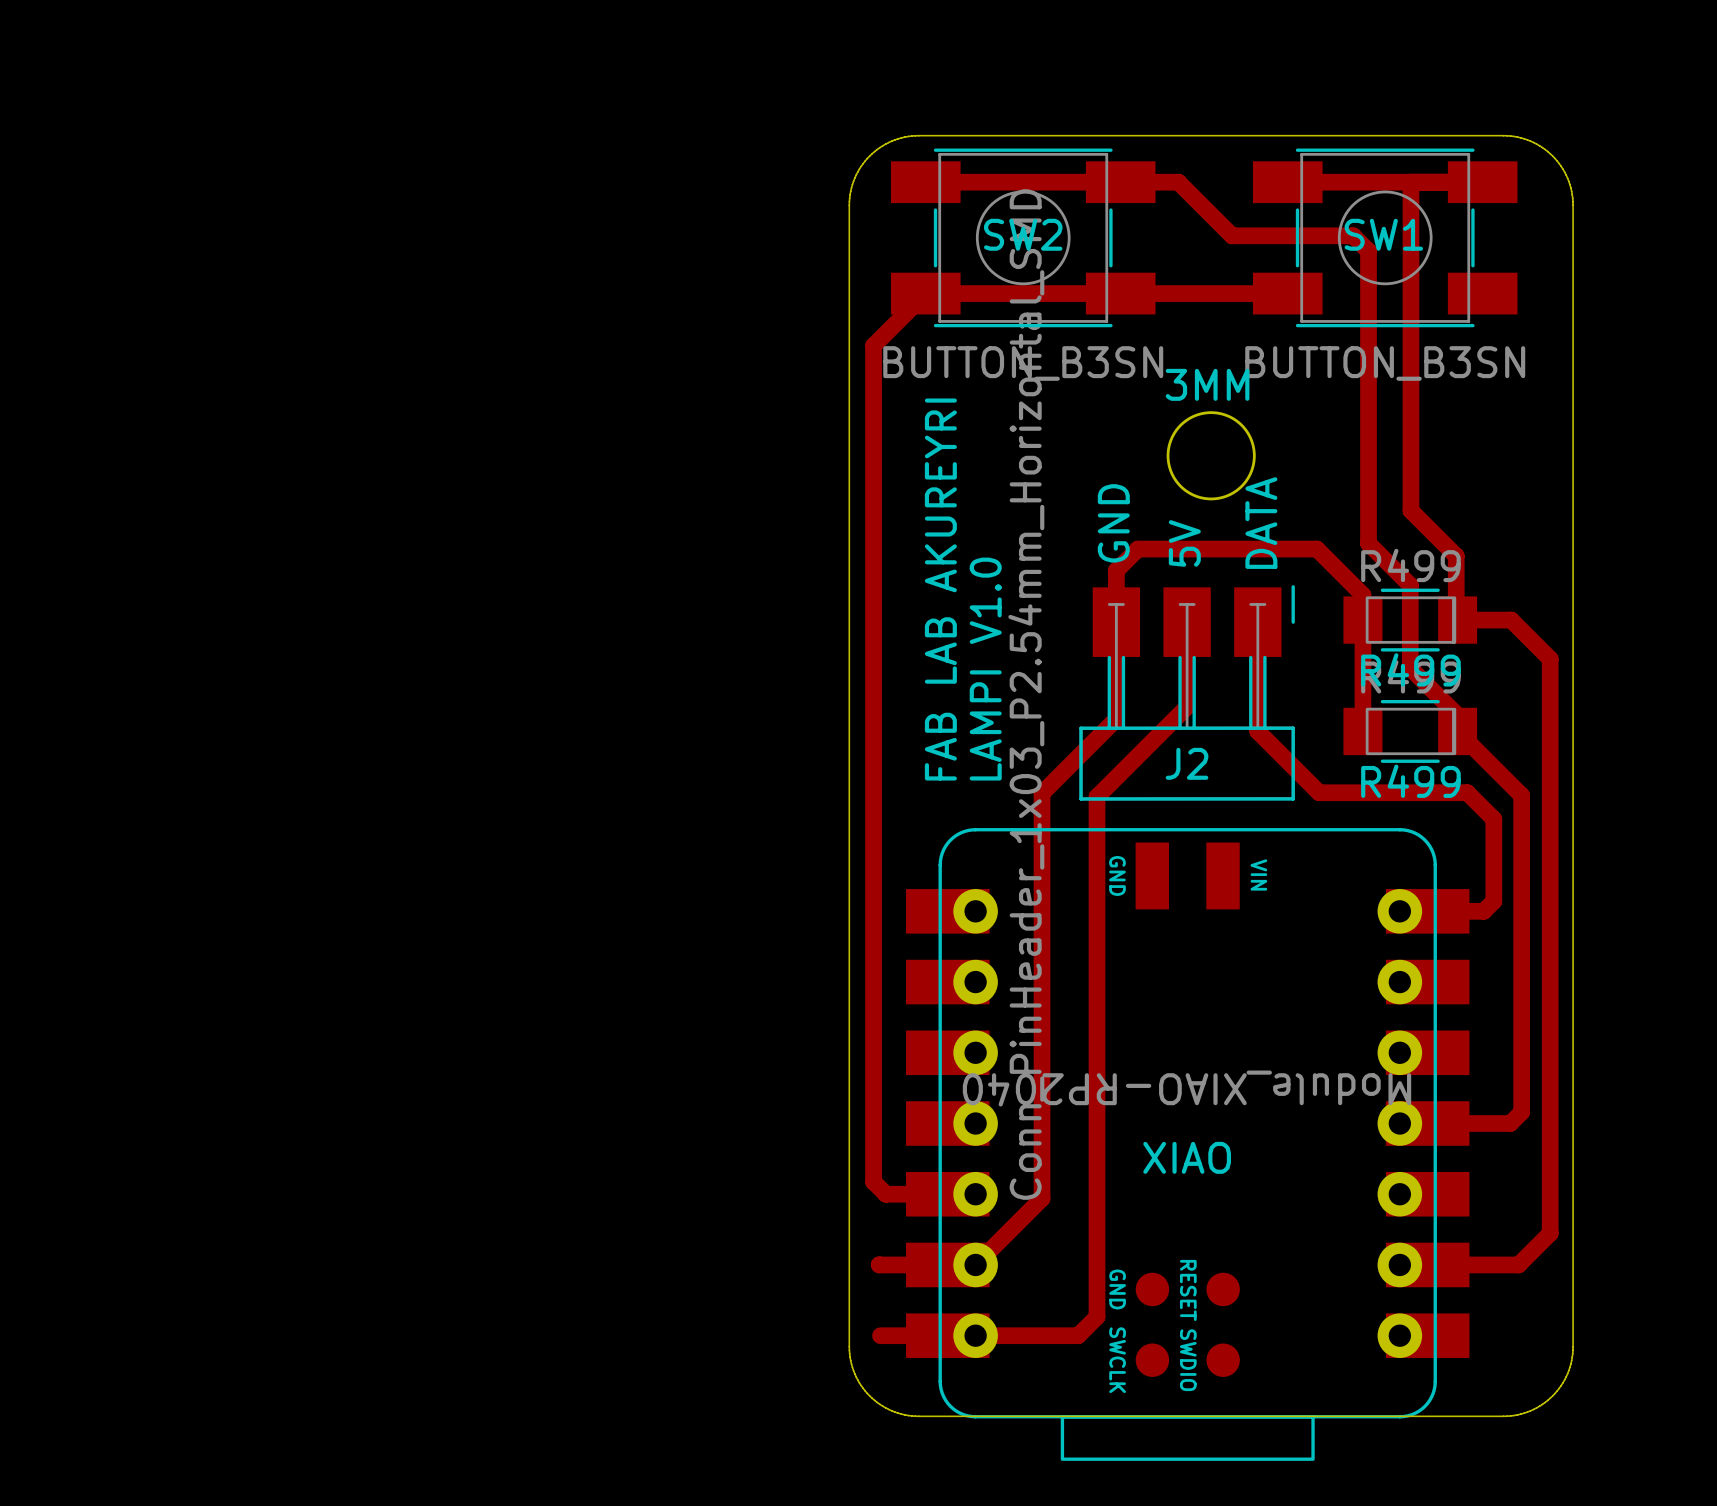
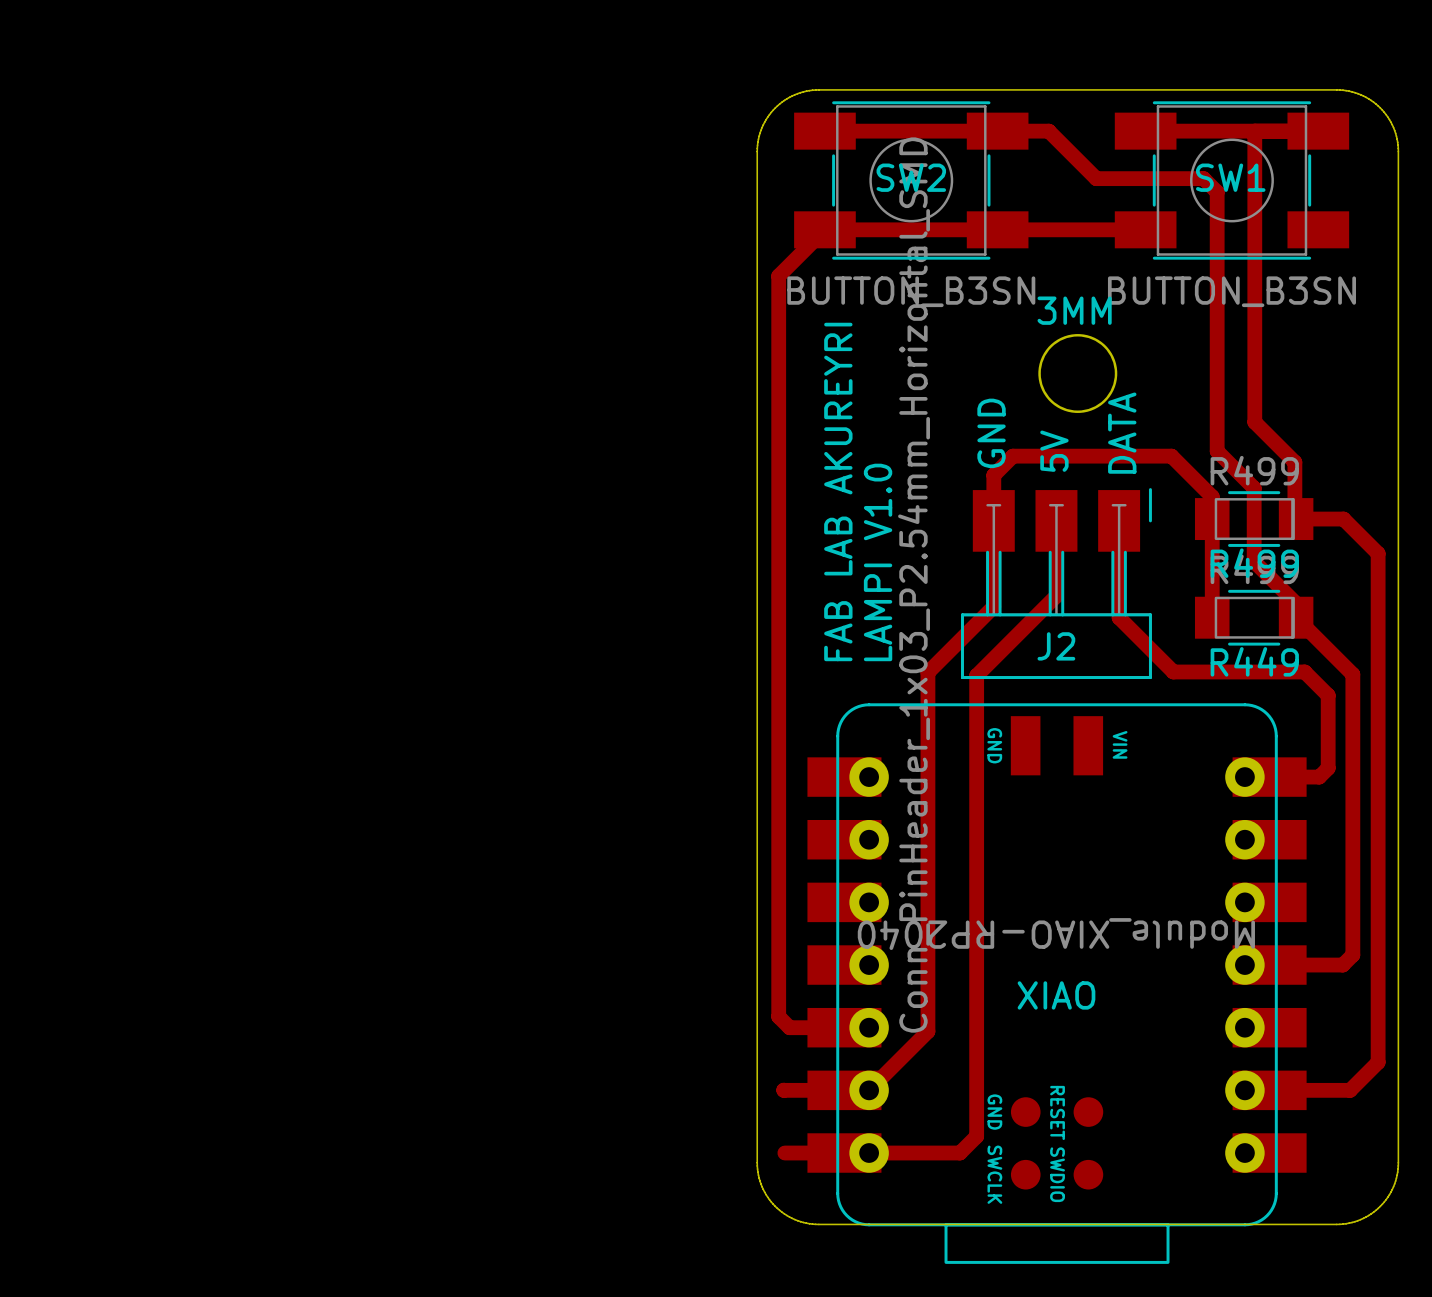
R499 name: R499 (1410, 781) -> R449 (1254, 661)

